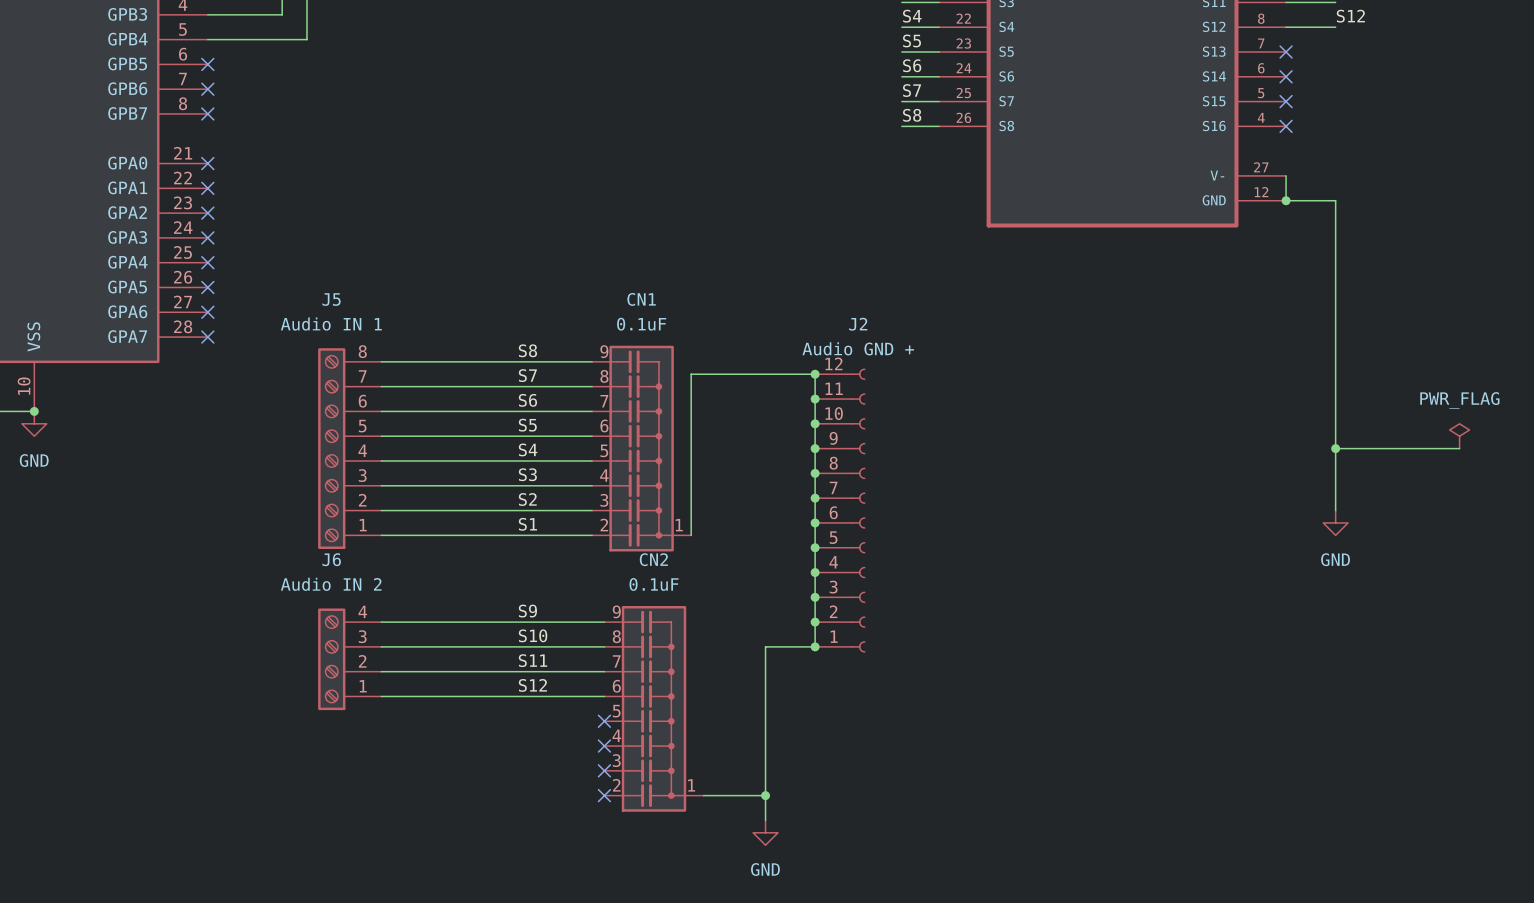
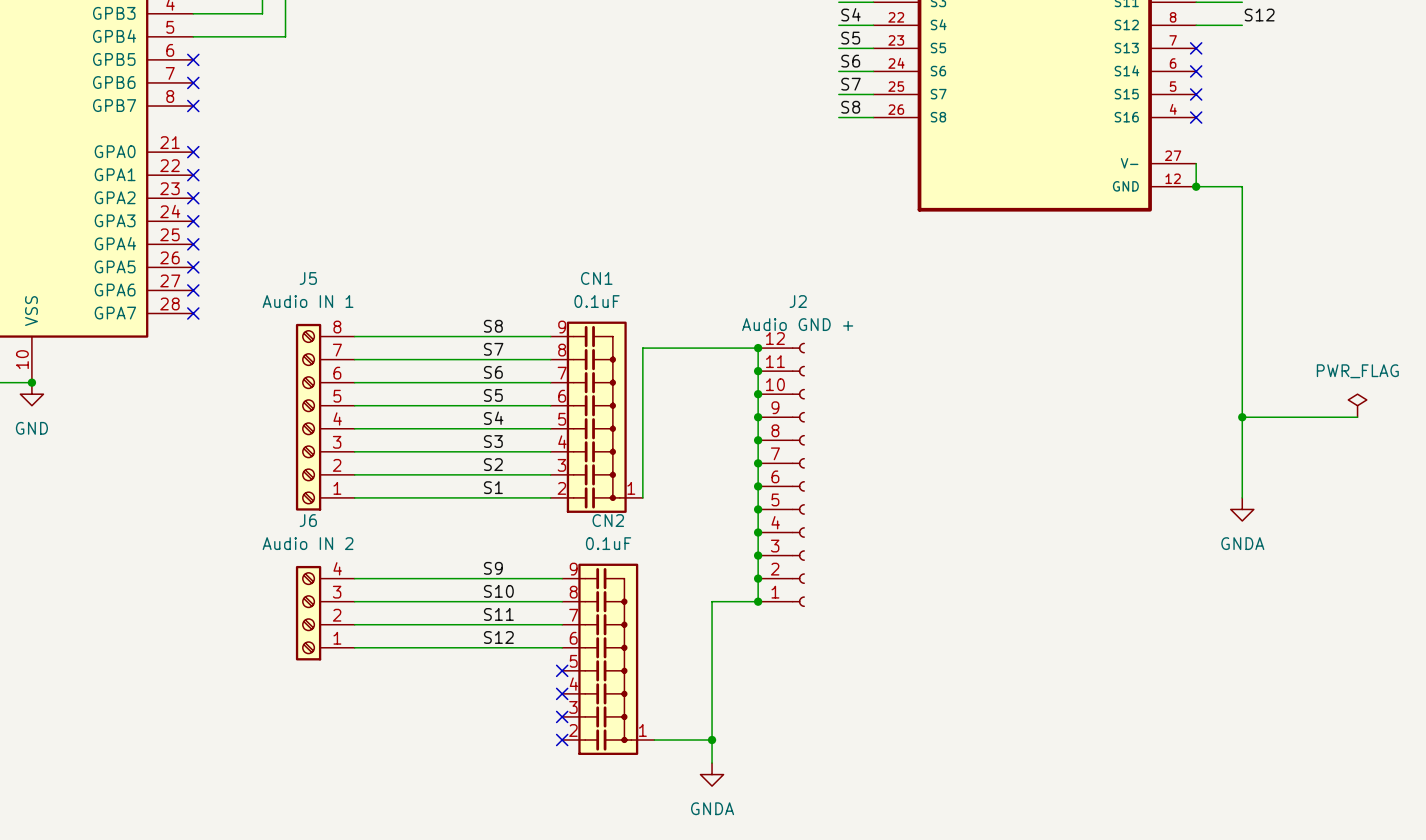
power symbol: GND (1335, 522) -> none
power symbol: none -> GNDA (1242, 509)
power symbol: GND (765, 832) -> GNDA (712, 774)

